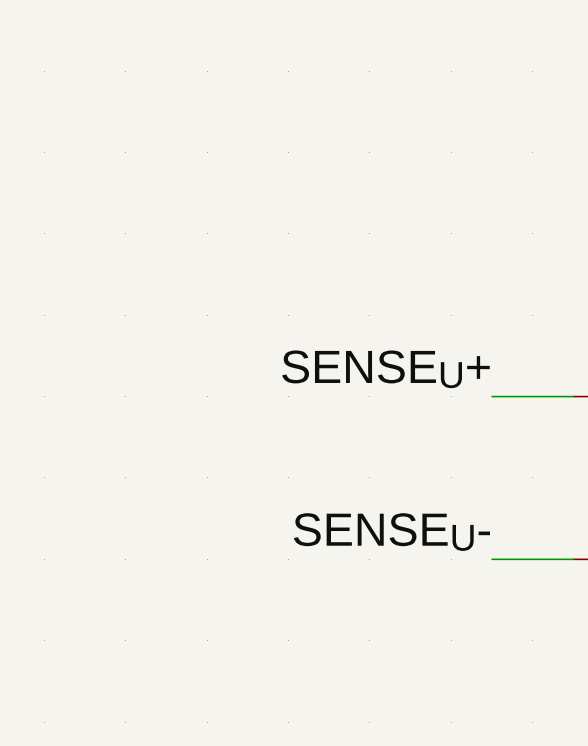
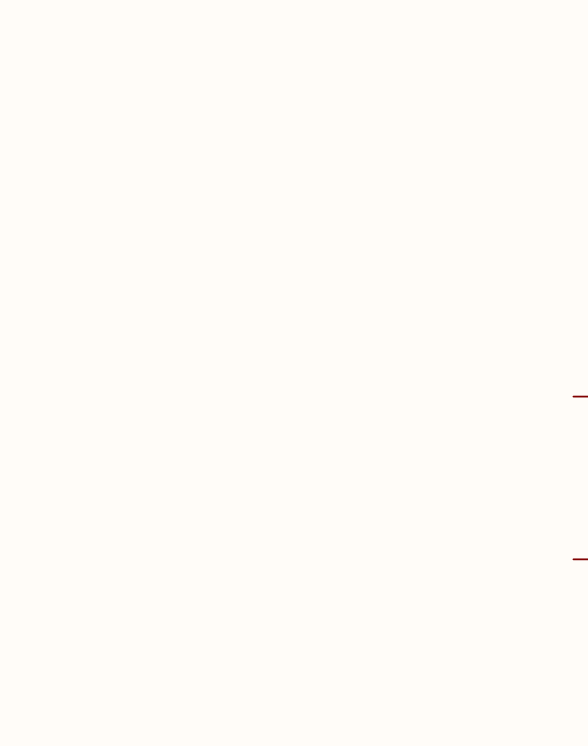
label: SENSEU+ (385, 369) -> none
wire: (492, 396) (573, 396) -> none
label: SENSEU- (391, 532) -> none
wire: (492, 559) (573, 559) -> none

